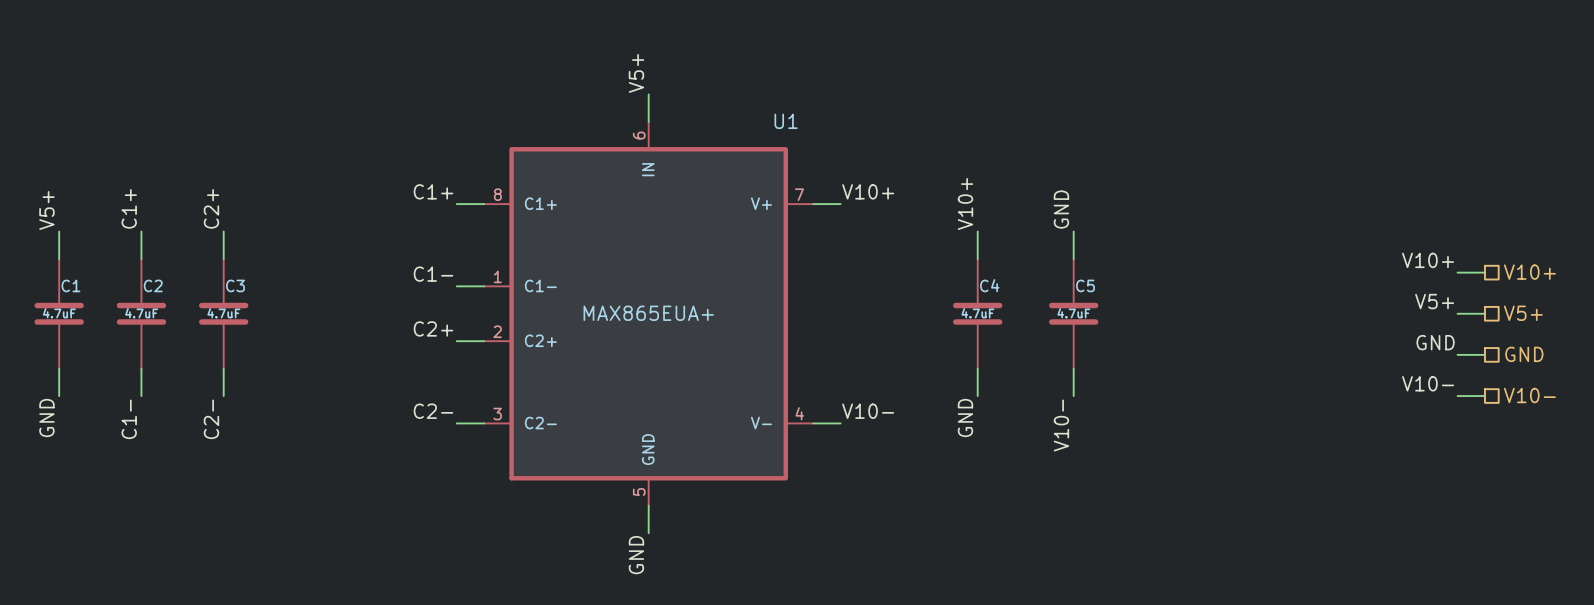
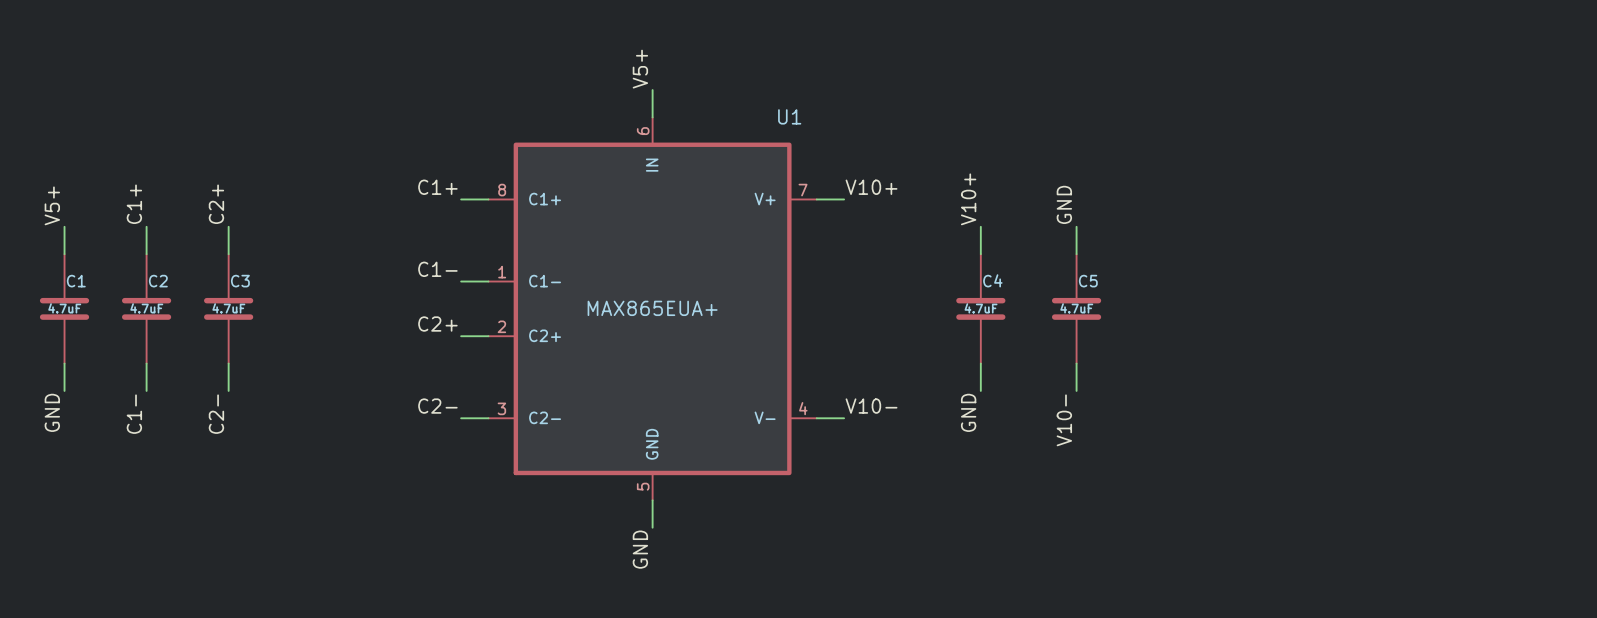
label: V10+ (1428, 260) -> none
wire: (1457, 272) (1484, 272) -> none
hierarchical label: V10+ (1529, 272) -> none
label: V5+ (1434, 301) -> none
wire: (1457, 313) (1484, 313) -> none
hierarchical label: V5+ (1523, 313) -> none
label: GND (1435, 342) -> none
wire: (1457, 354) (1484, 354) -> none
hierarchical label: GND (1524, 354) -> none
label: V10- (1428, 383) -> none
hierarchical label: V10- (1529, 395) -> none
wire: (1457, 396) (1484, 396) -> none

